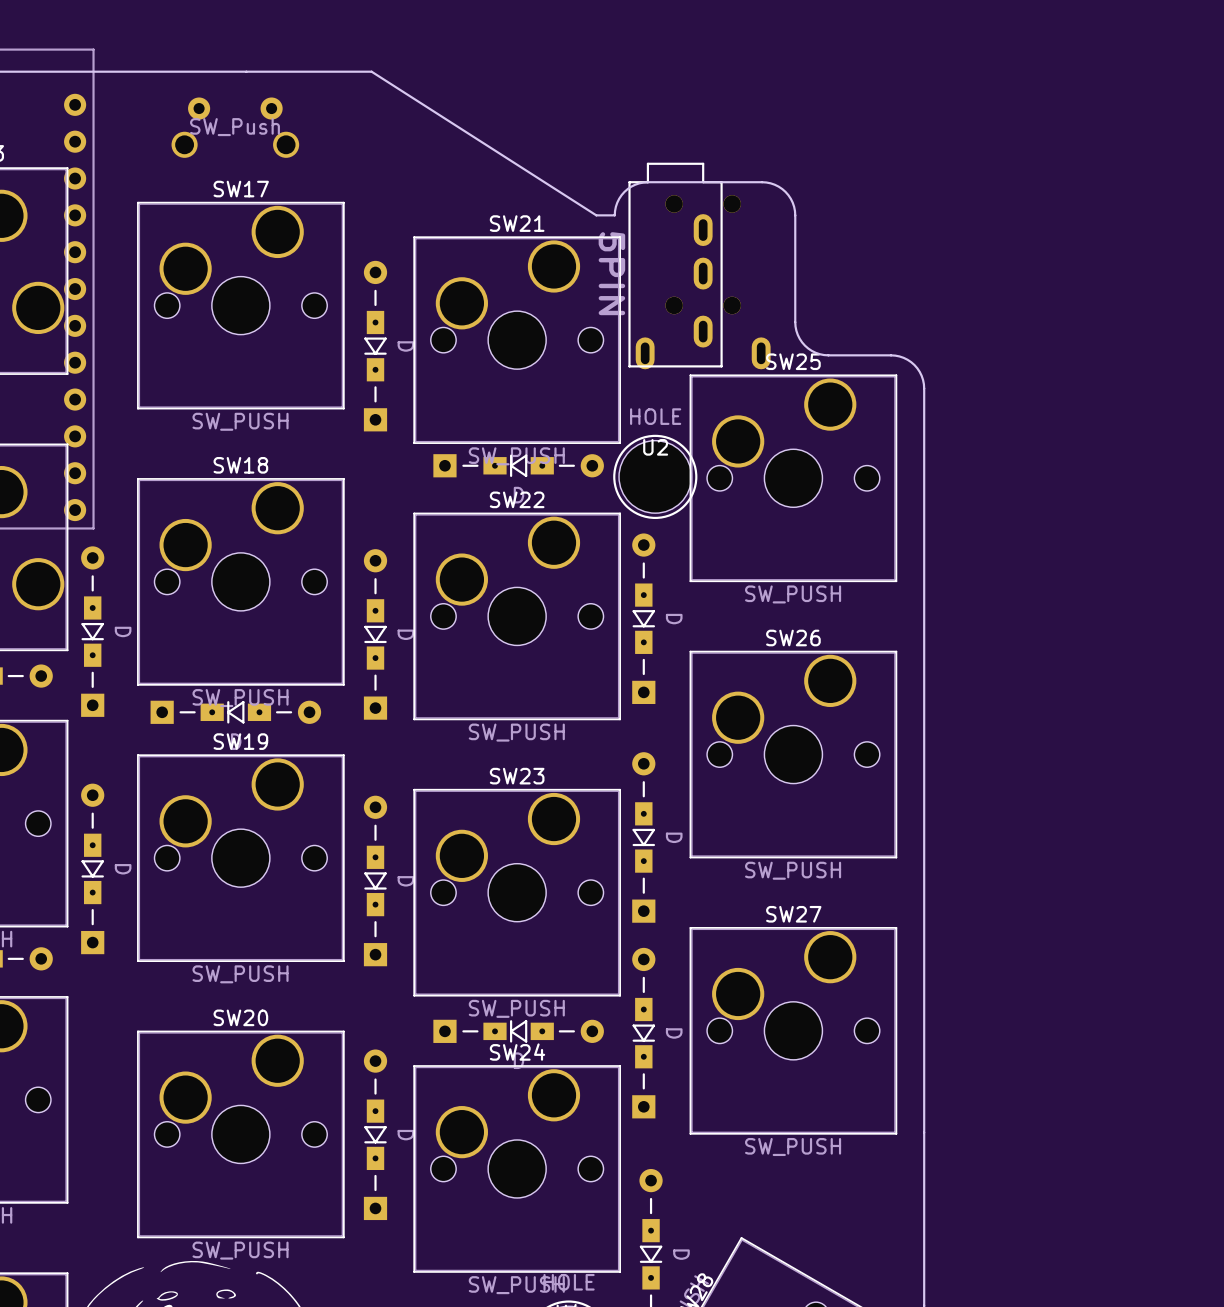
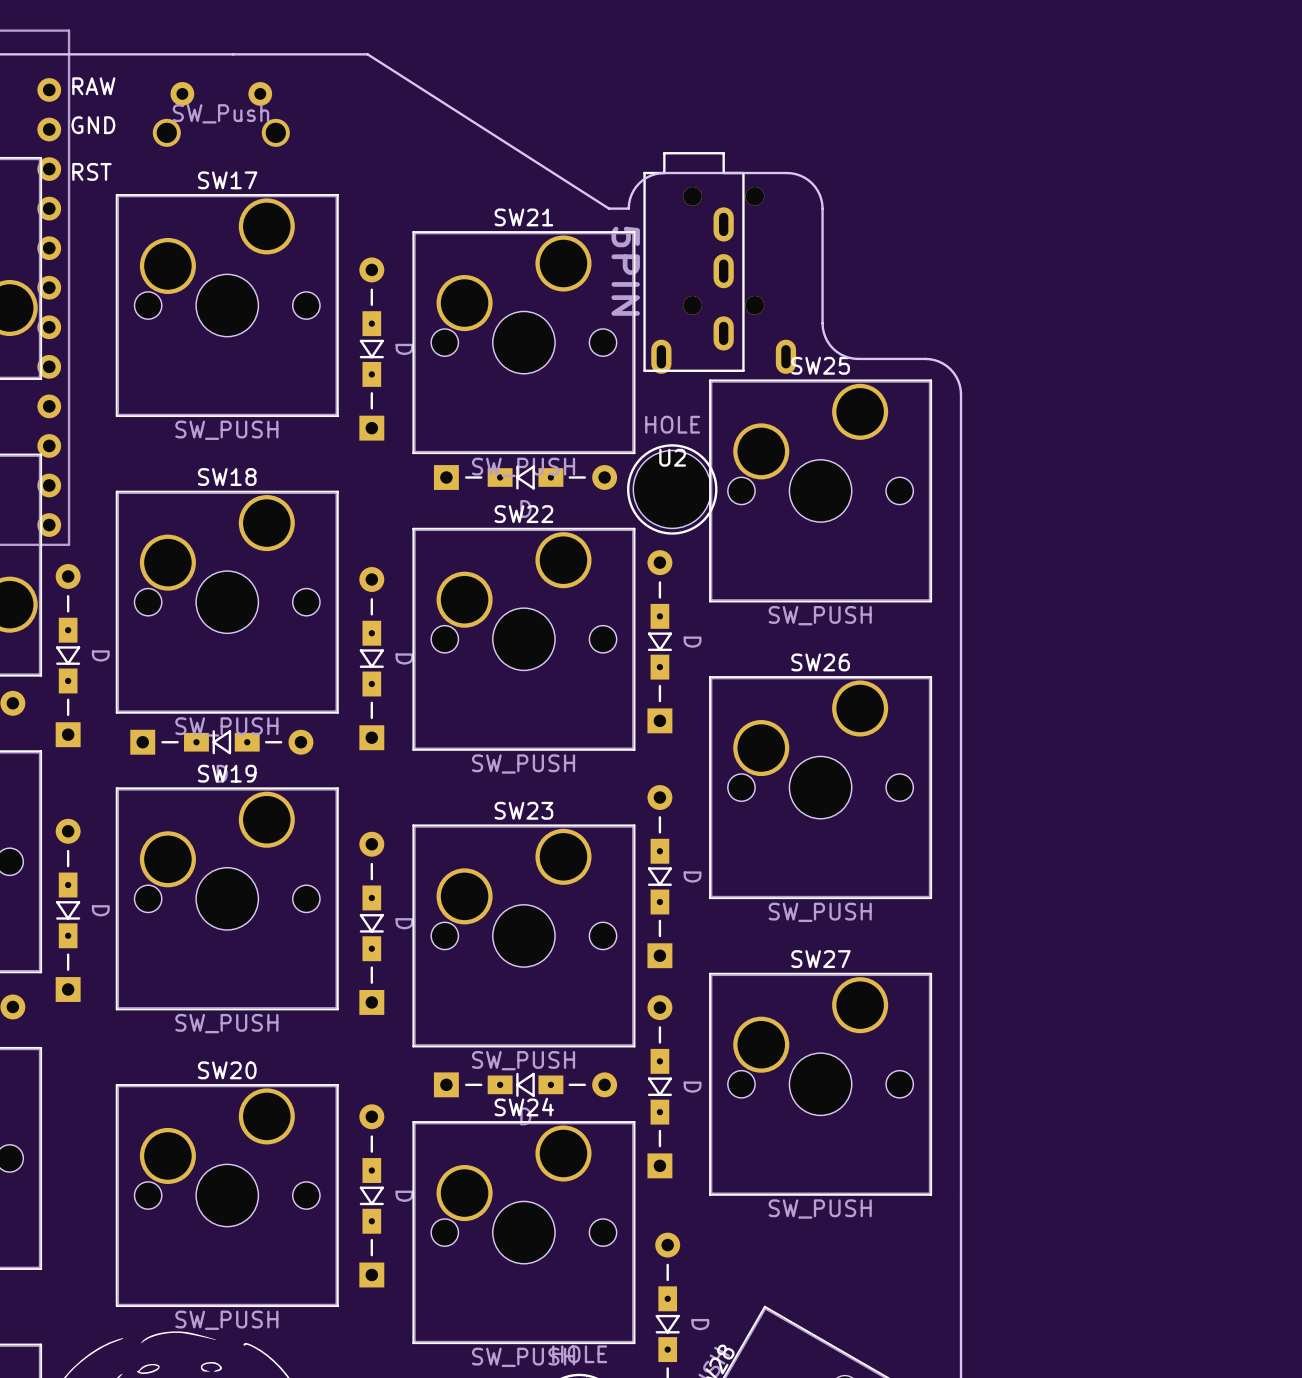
text: none -> RAW (93, 86)
text: none -> GND (93, 125)
text: none -> RST (91, 171)

